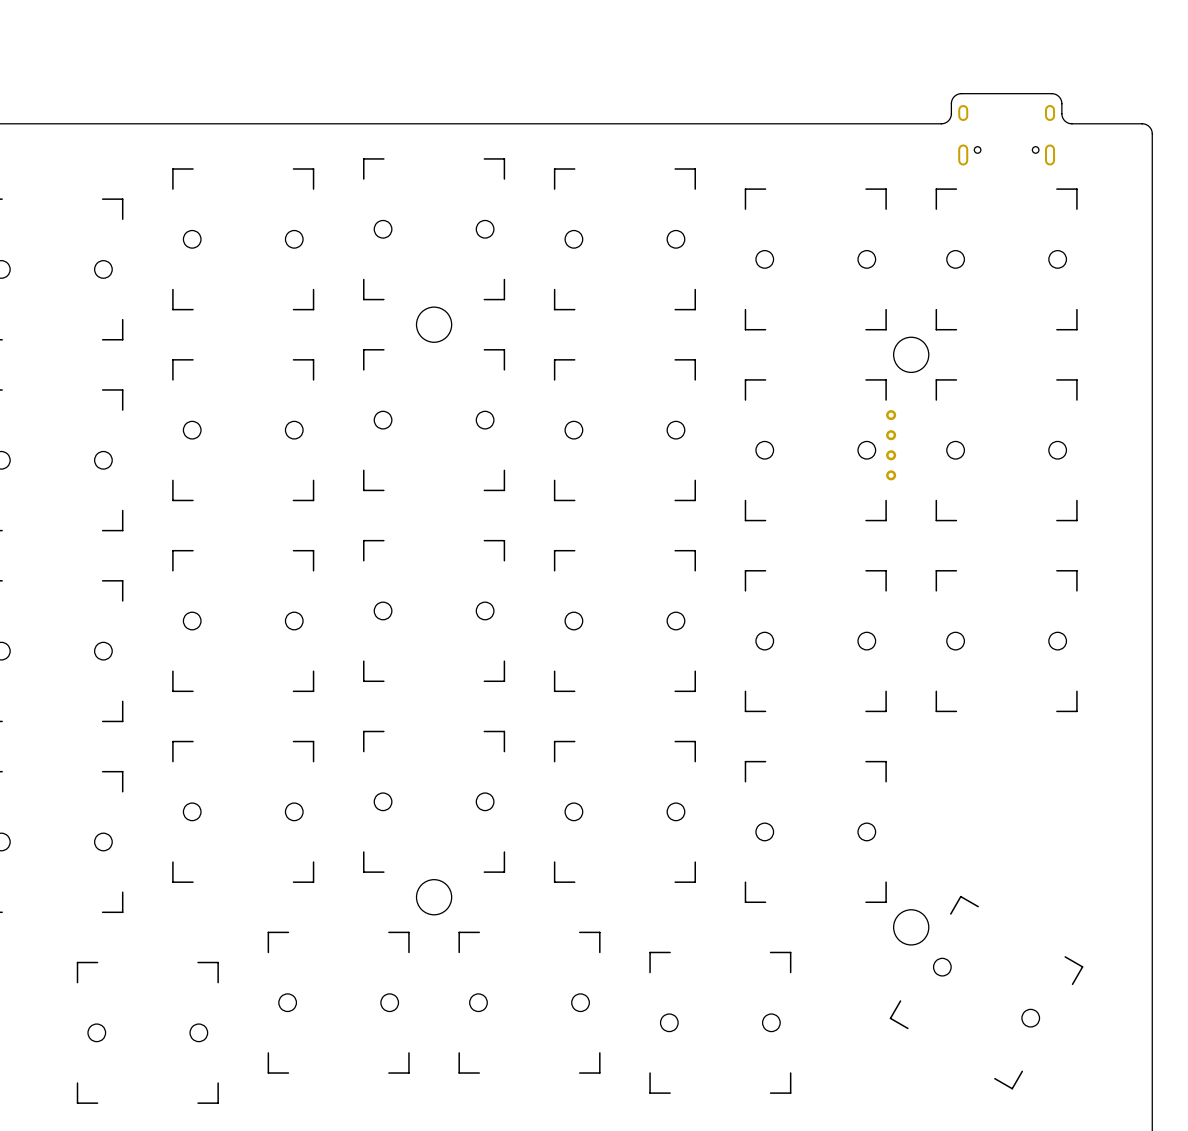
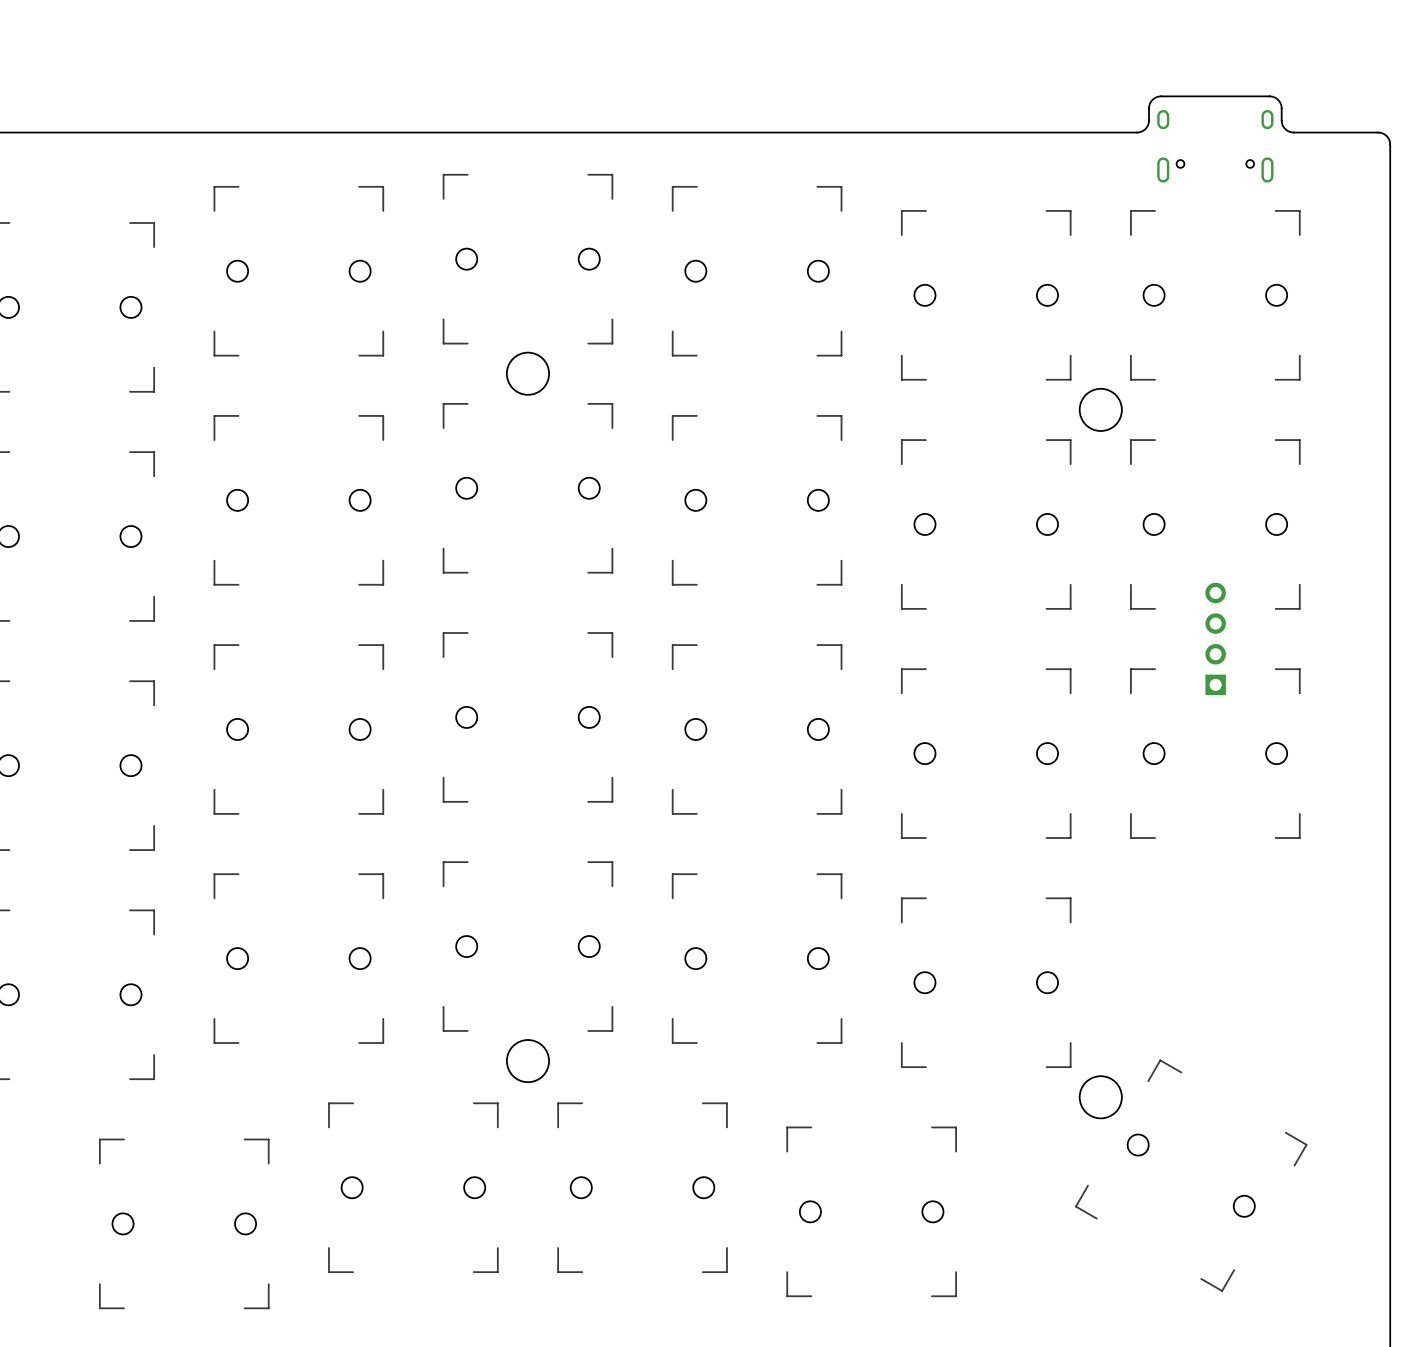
part: (891, 415) -> none
part: (891, 435) -> none
part: (891, 455) -> none
part: (891, 475) -> none
part: none -> (1215, 638)

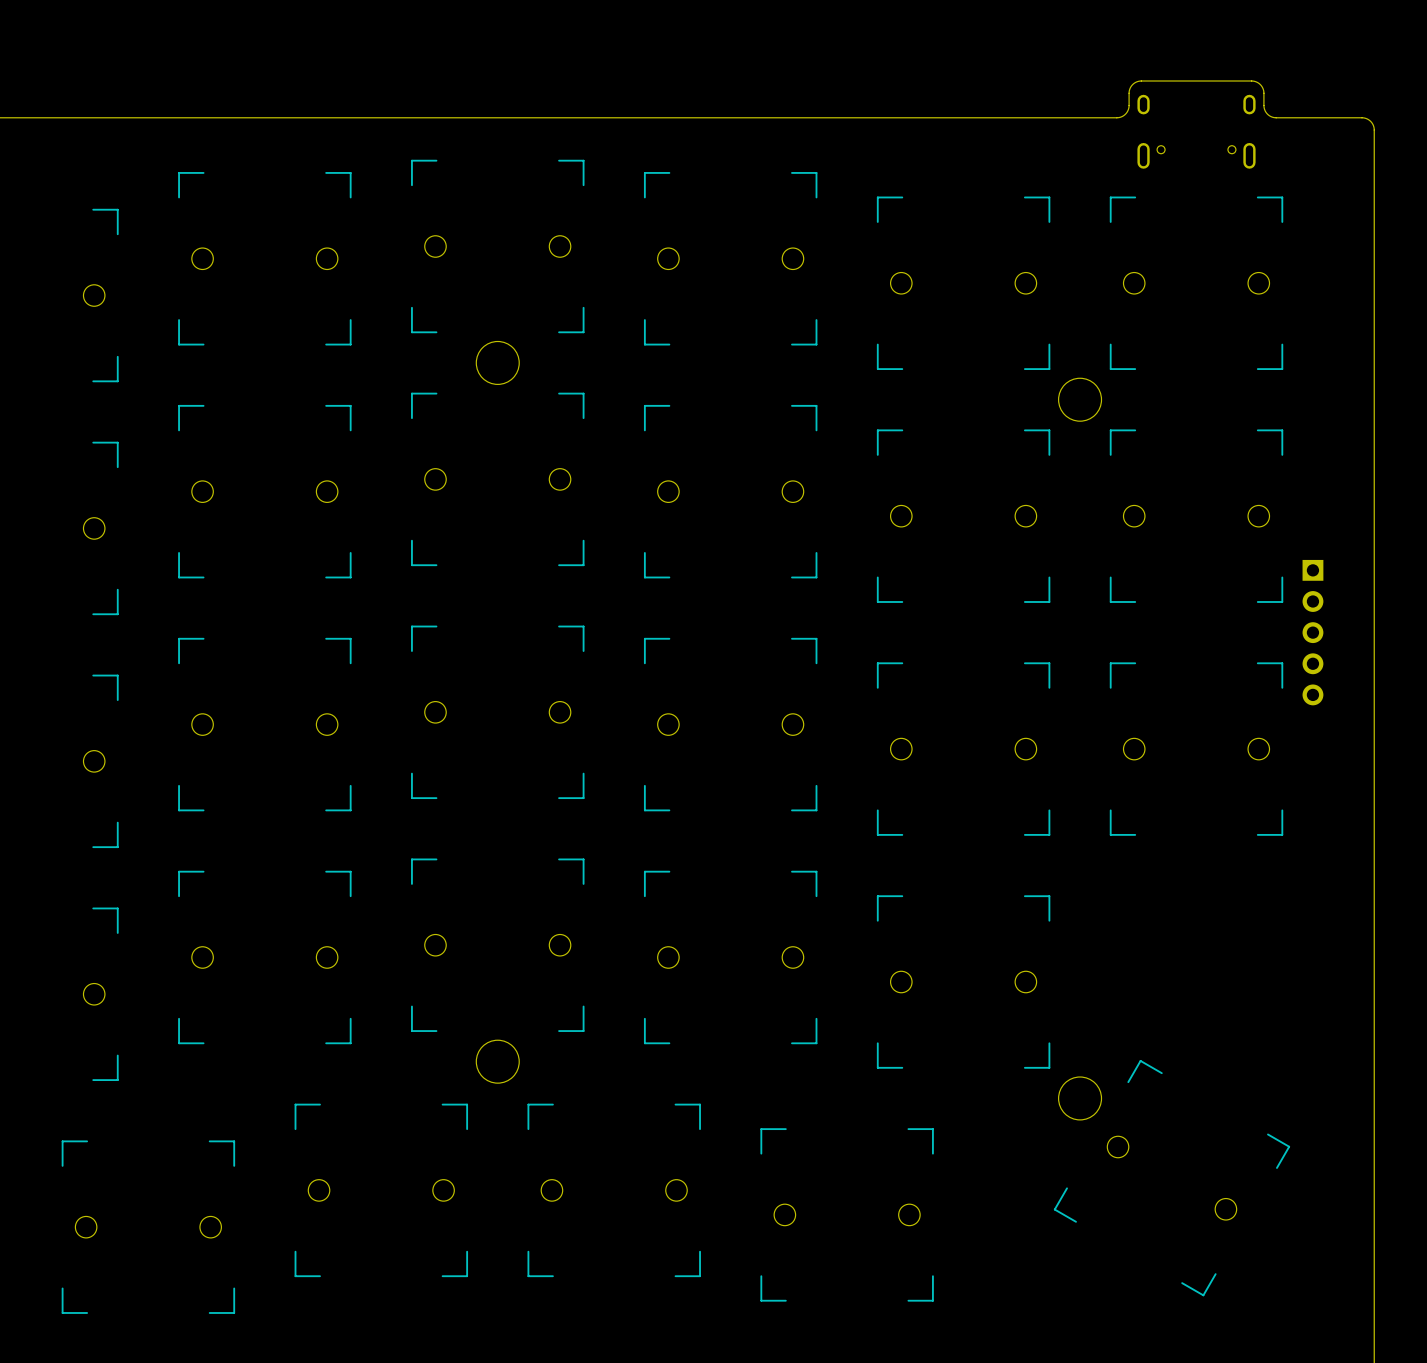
part: (1215, 638) -> none
part: none -> (1312, 632)

